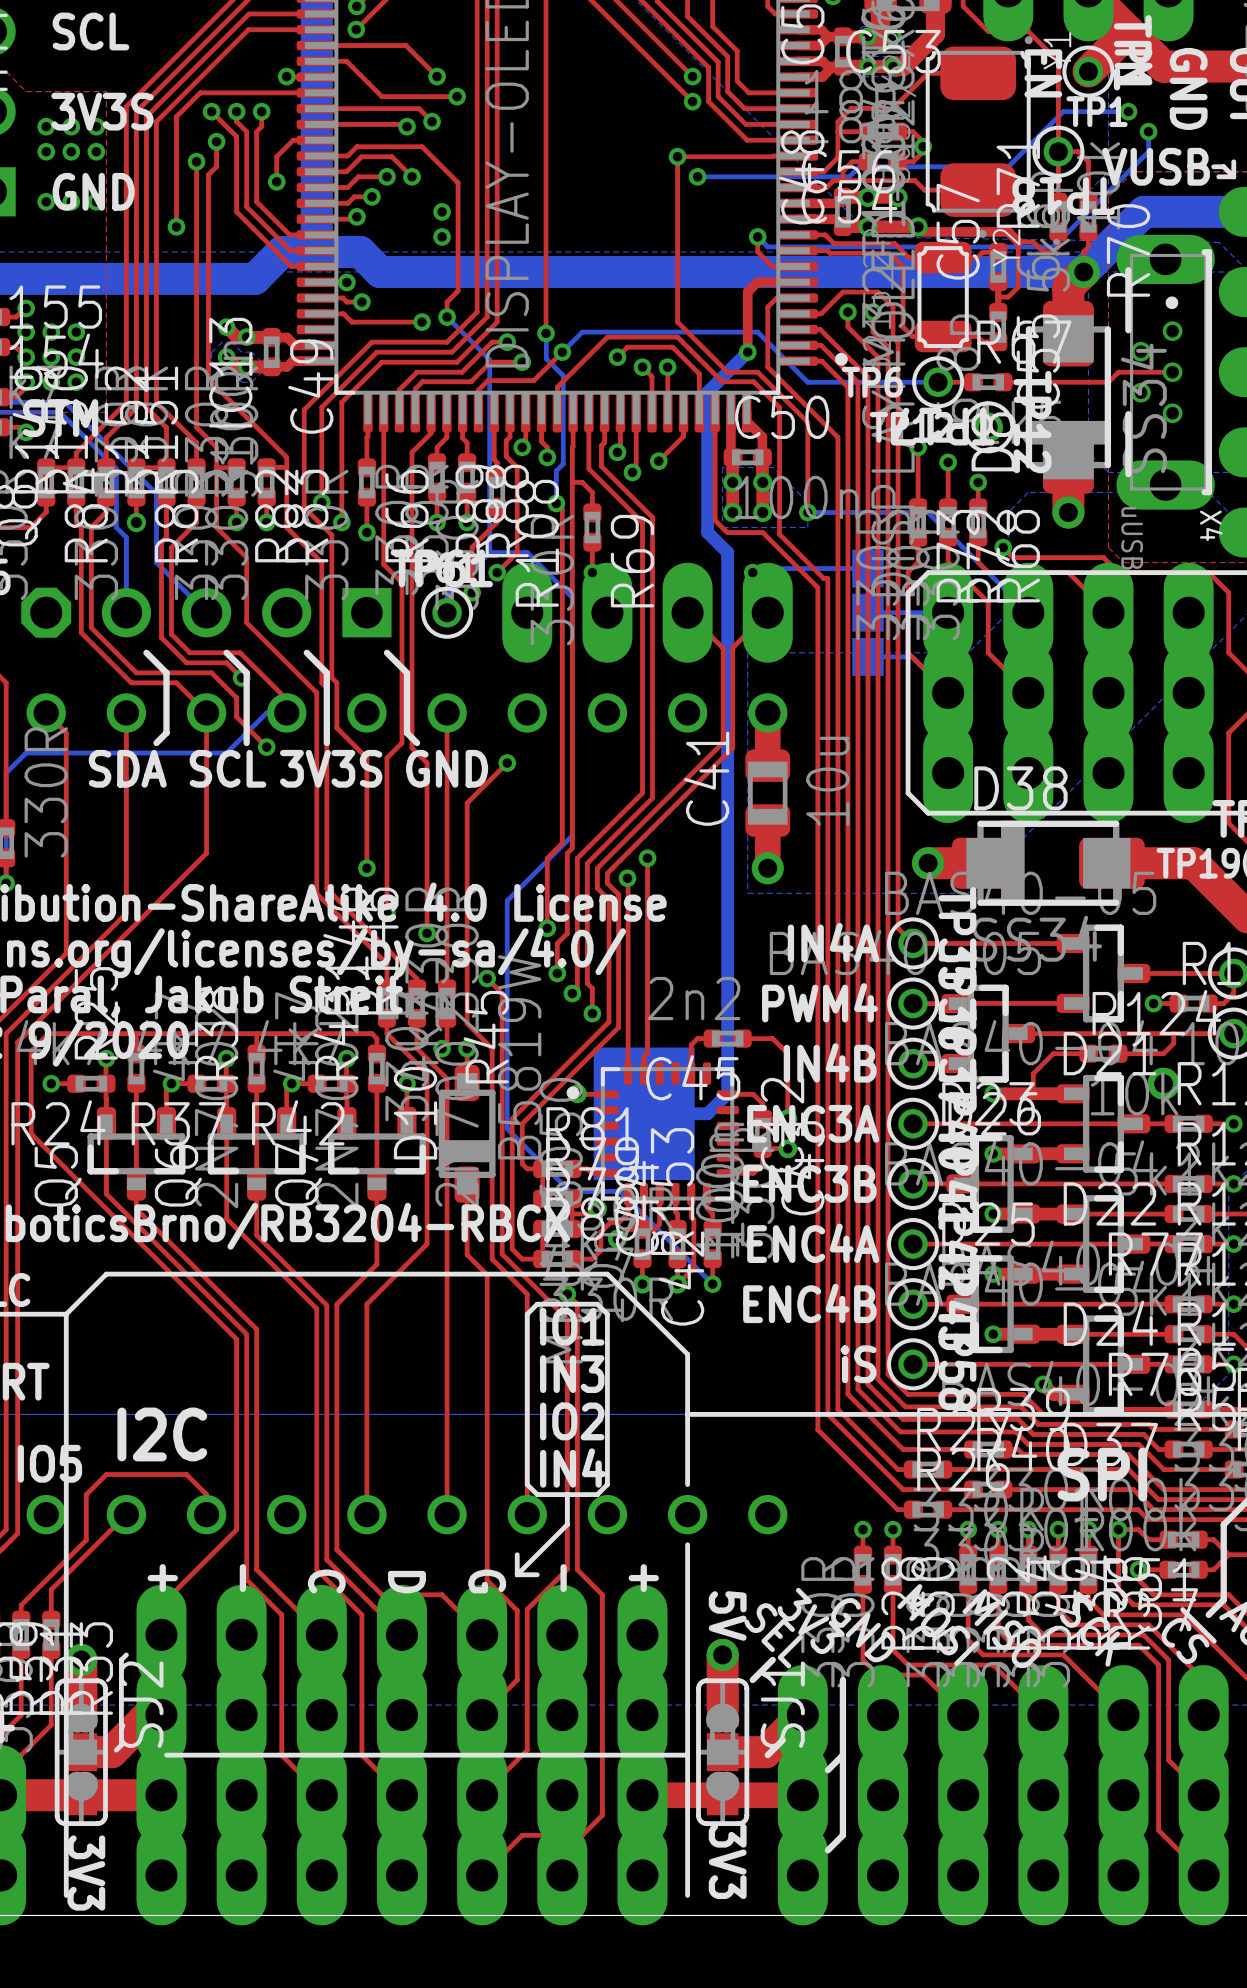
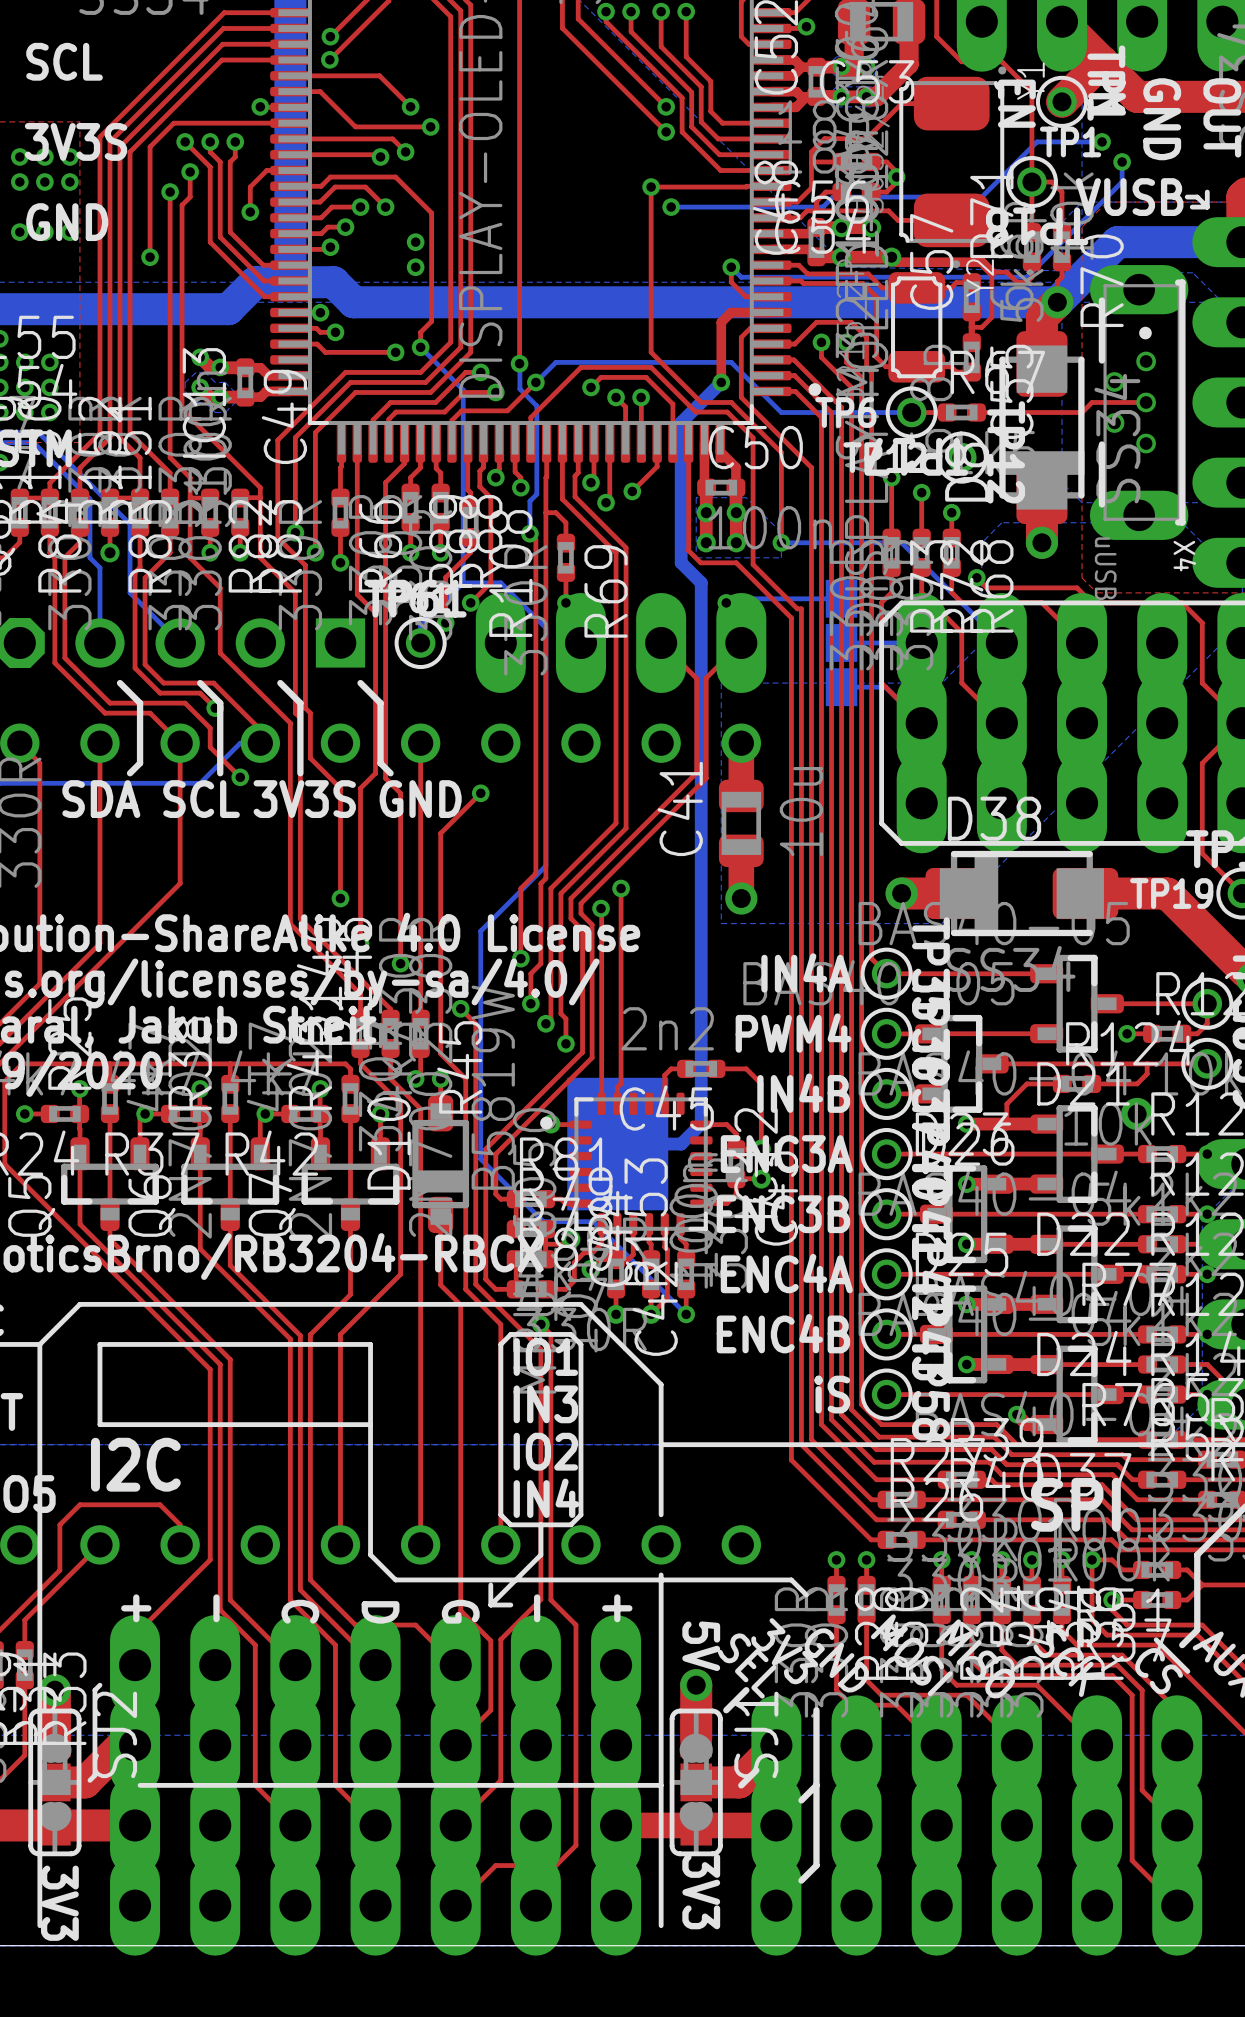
line: none -> (370, 1424) (99, 1424) (99, 1344) (370, 1344) (370, 1554) (395, 1579) (791, 1579) (806, 1594)

